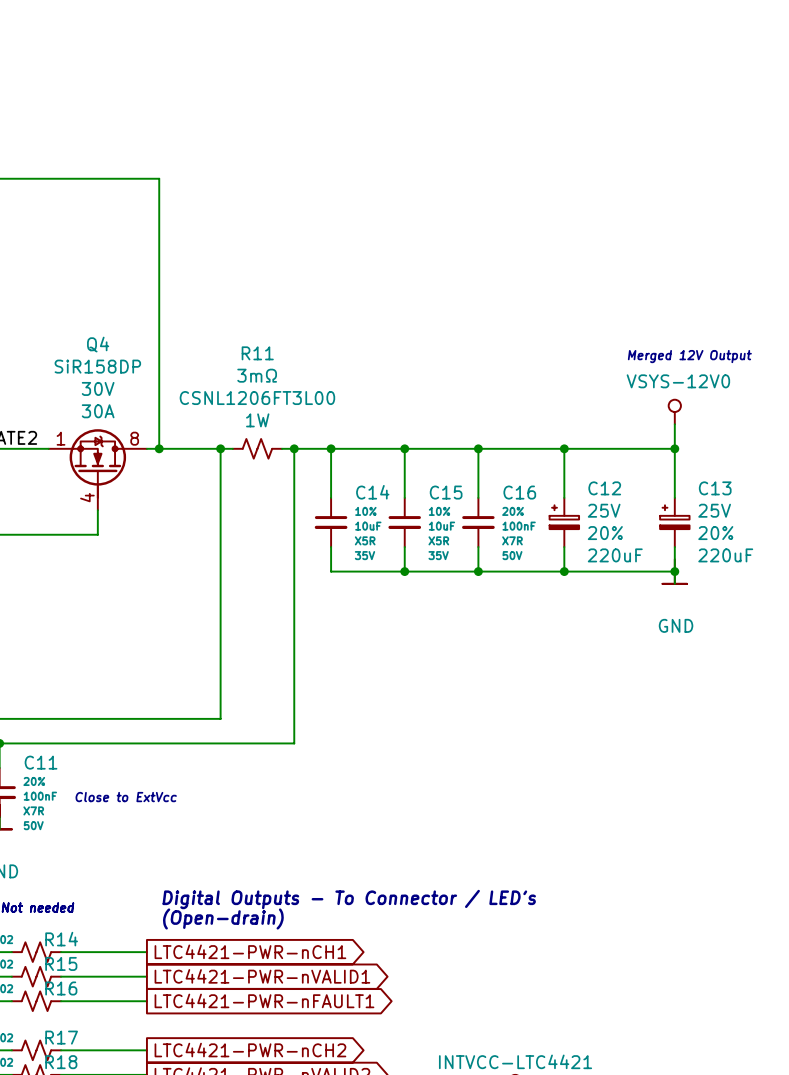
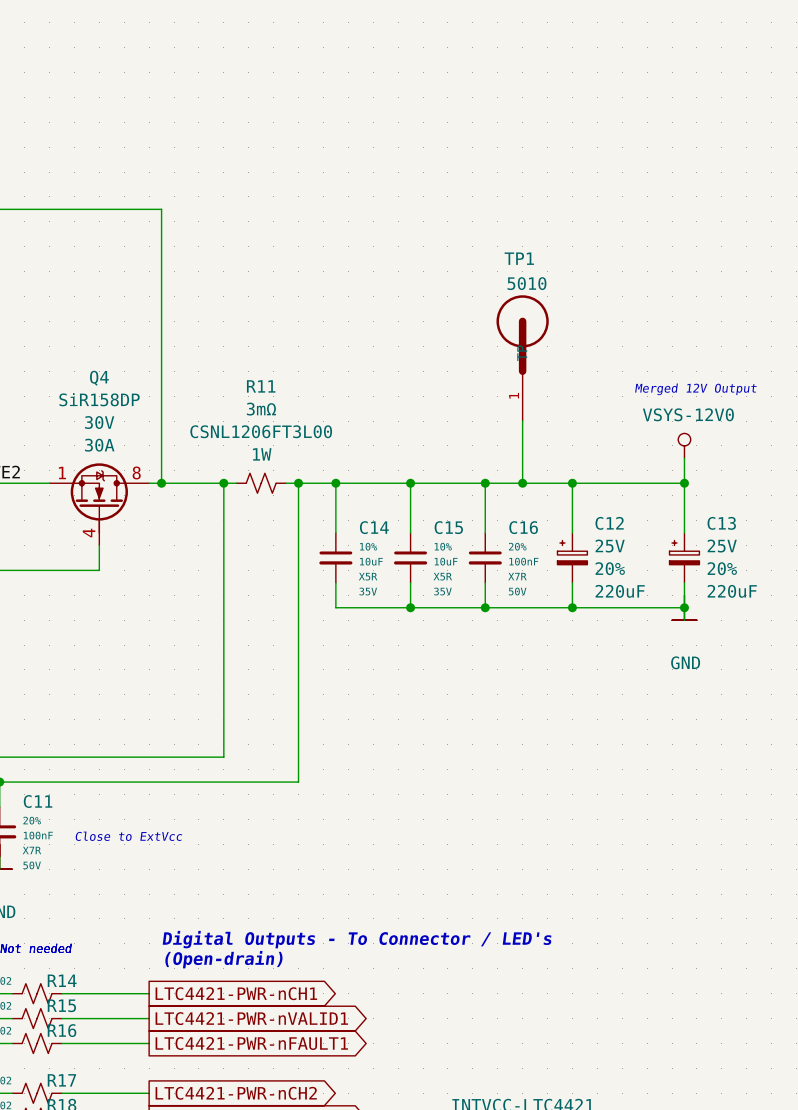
TP1: none -> (522, 358)
wire: none -> (522, 421) (522, 483)
junction: none -> (522, 483)

